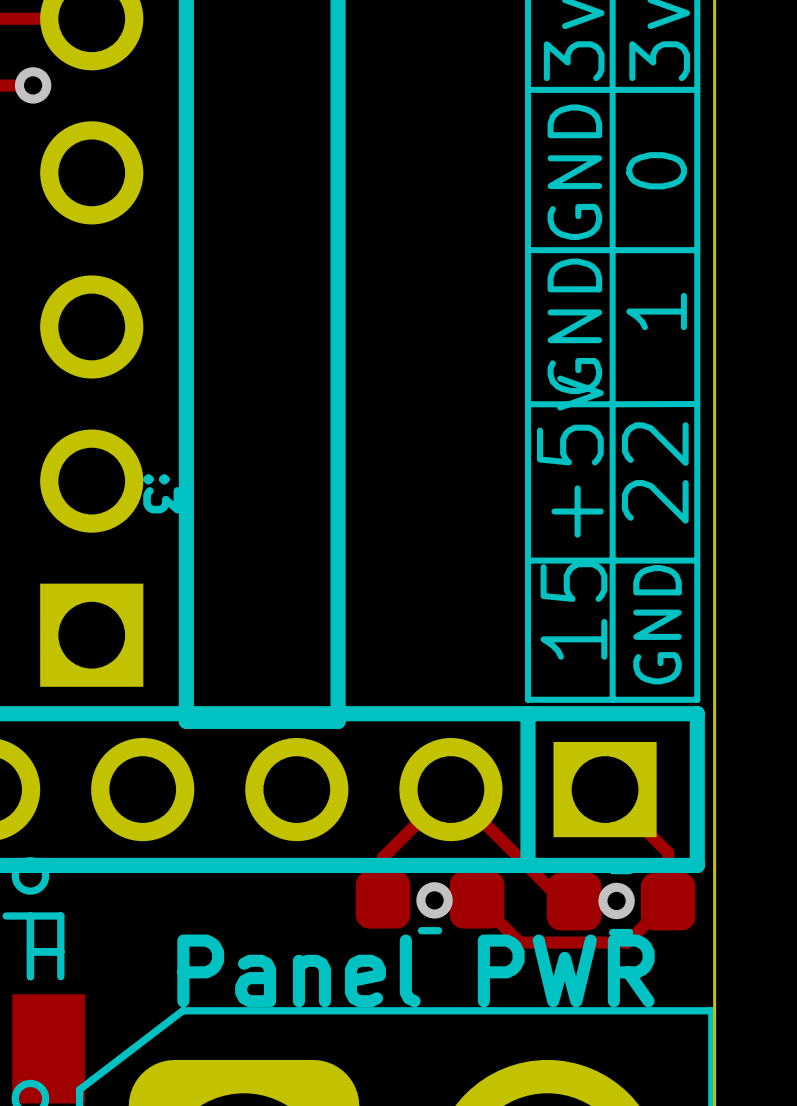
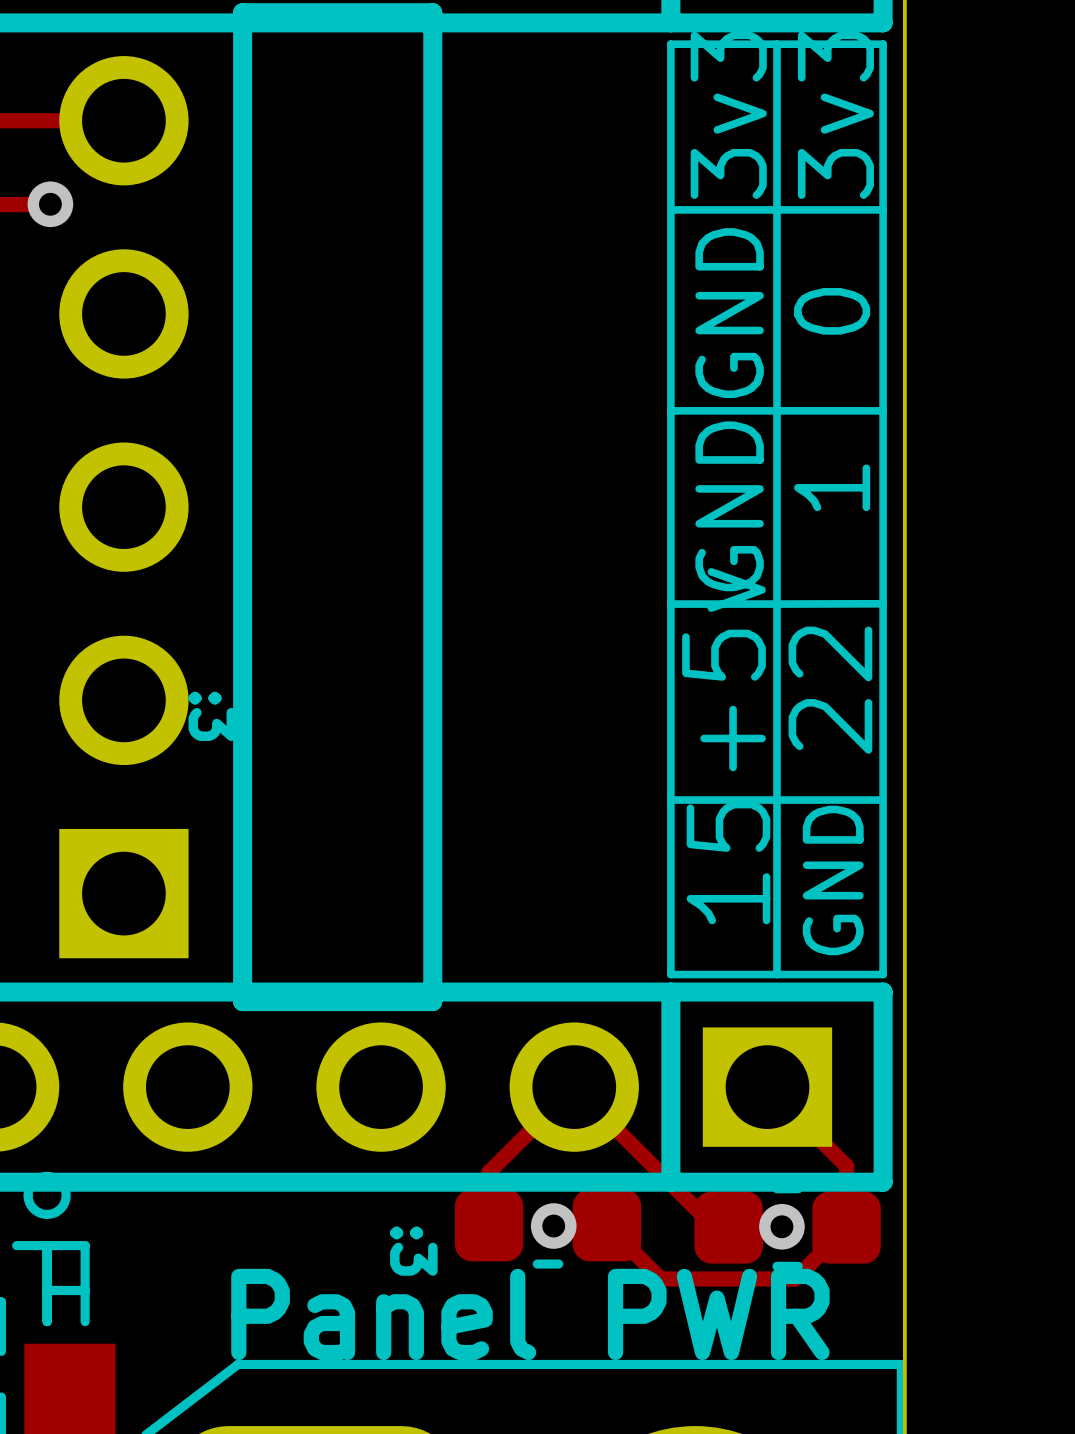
text: none -> :3 (413, 1251)

